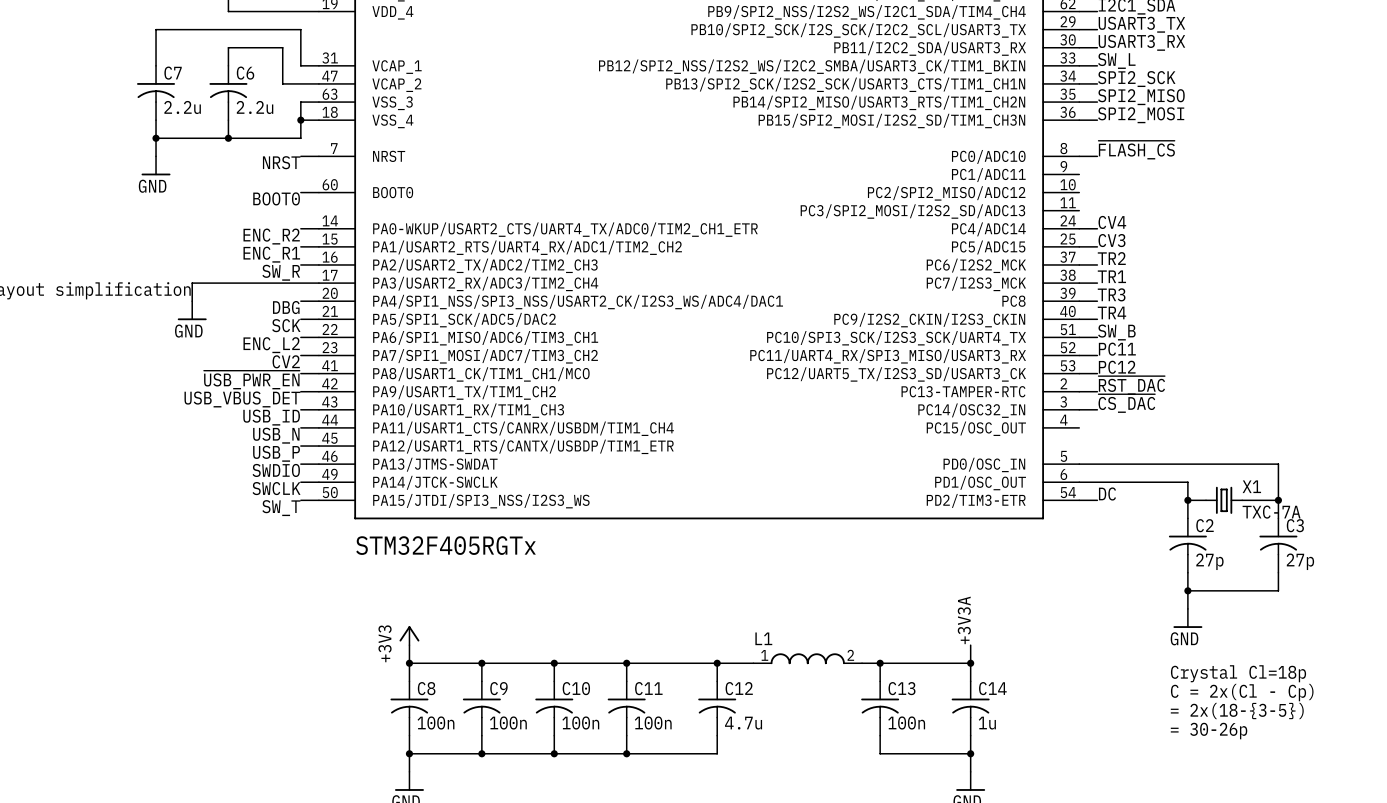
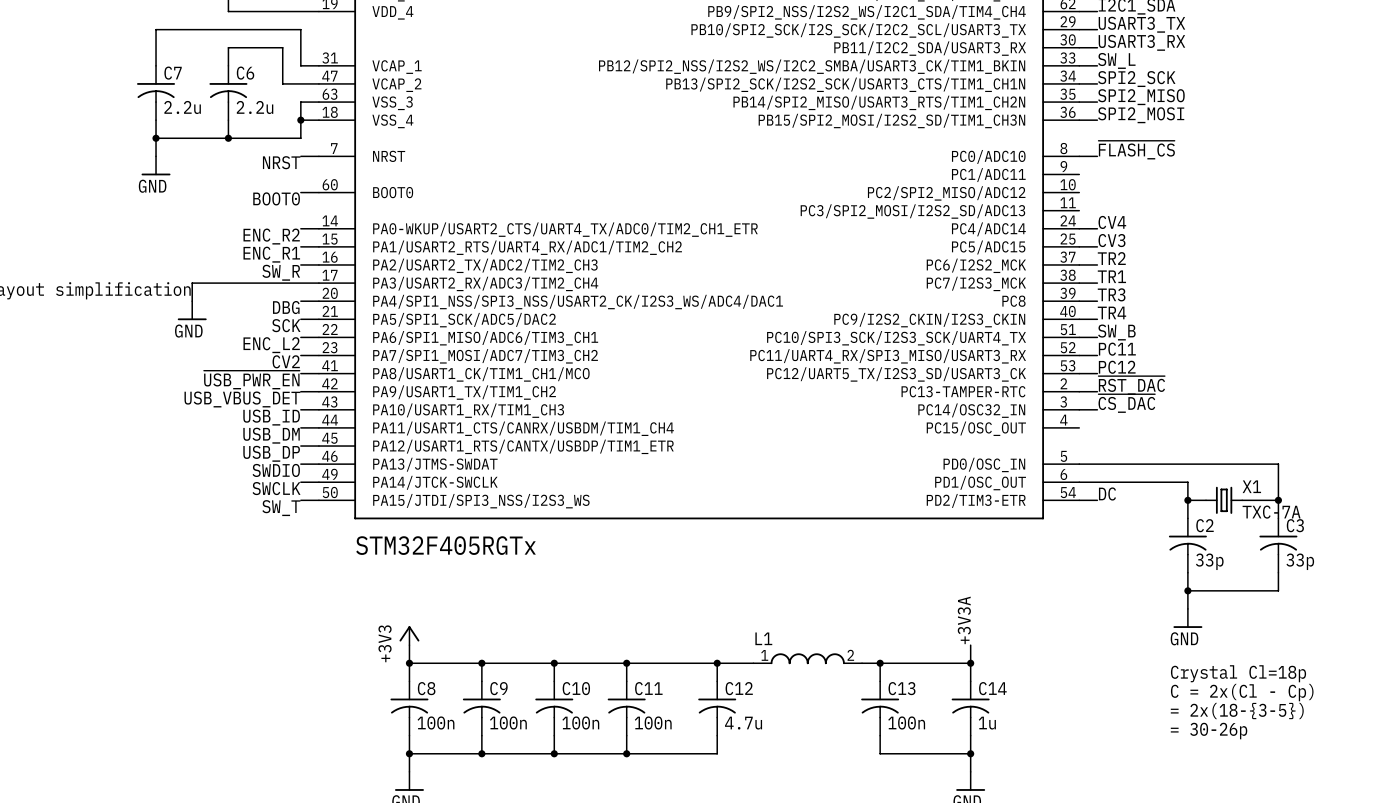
label: USB_N (276, 435) -> USB_DM (271, 435)
label: USB_P (276, 453) -> USB_DP (271, 453)
C2 value: 27p (1209, 561) -> 33p (1209, 561)
C3 value: 27p (1300, 561) -> 33p (1300, 561)

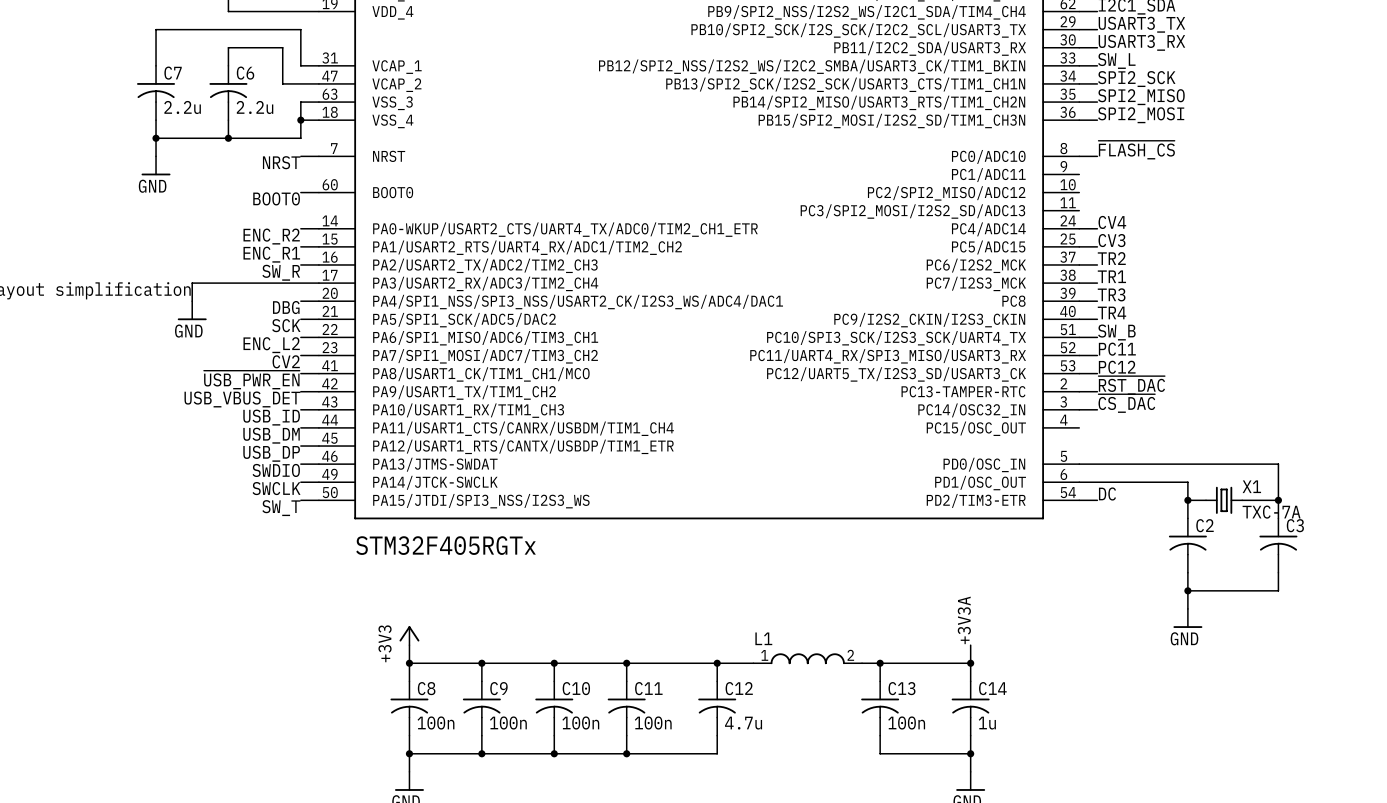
C2 value: 33p (1209, 561) -> none
C3 value: 33p (1300, 561) -> none
text: Crystal Cl=18p (1238, 673) -> none
text: C = 2x(Cl - Cp) (1242, 692) -> none
text: = 2x(18-{3-5}) (1237, 711) -> none
text: = 30-26p (1209, 731) -> none

